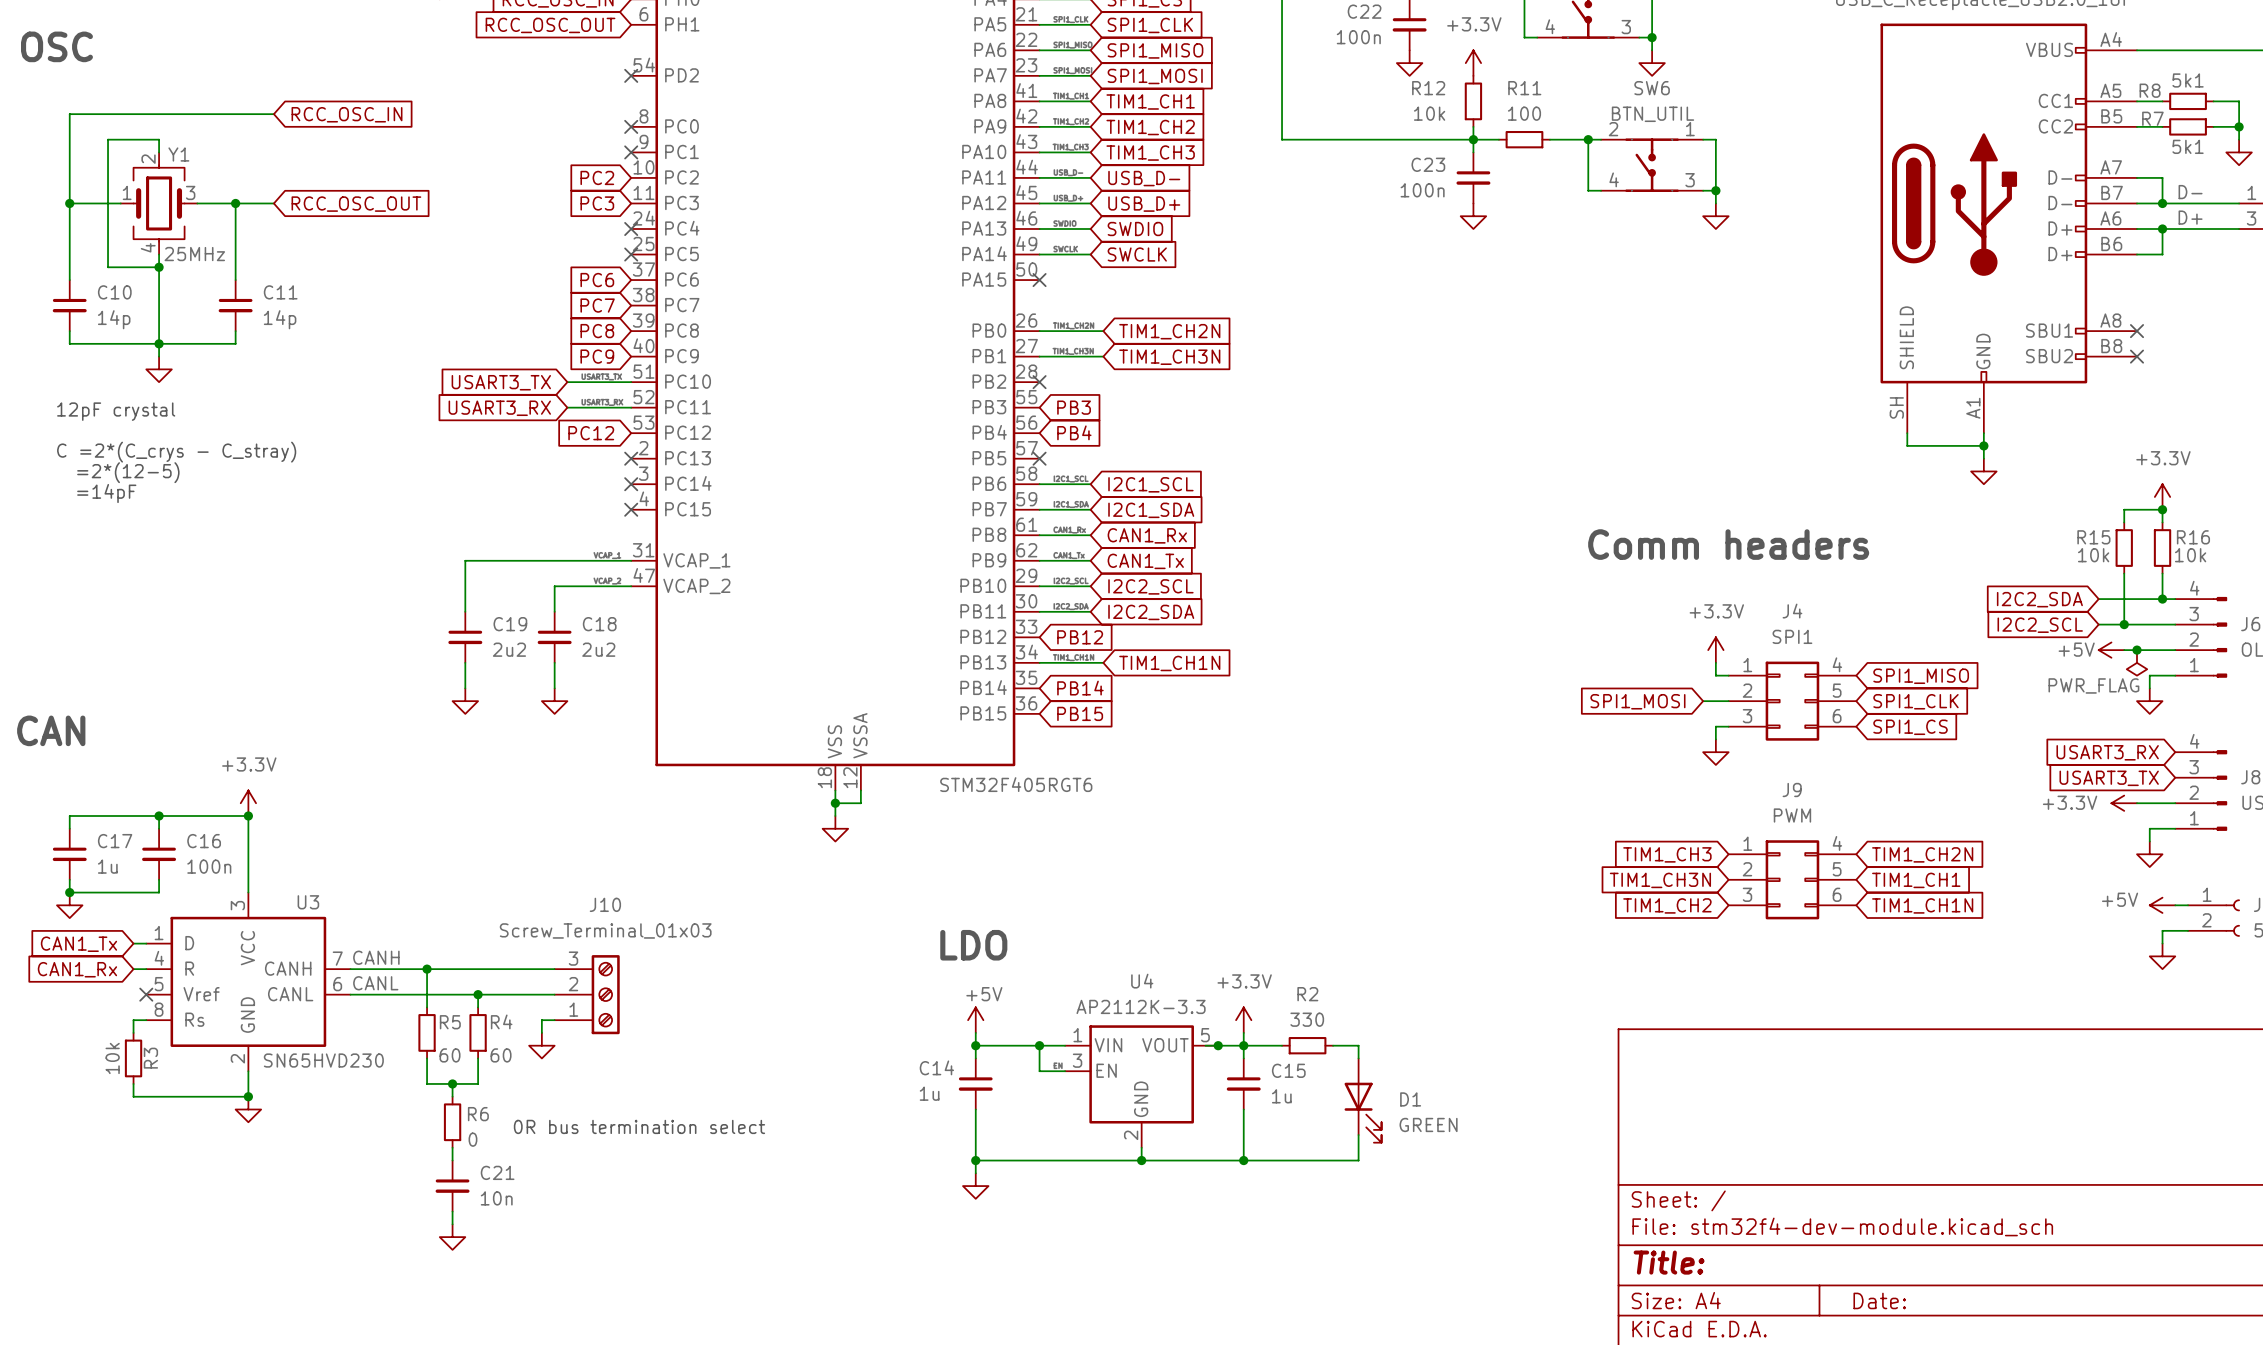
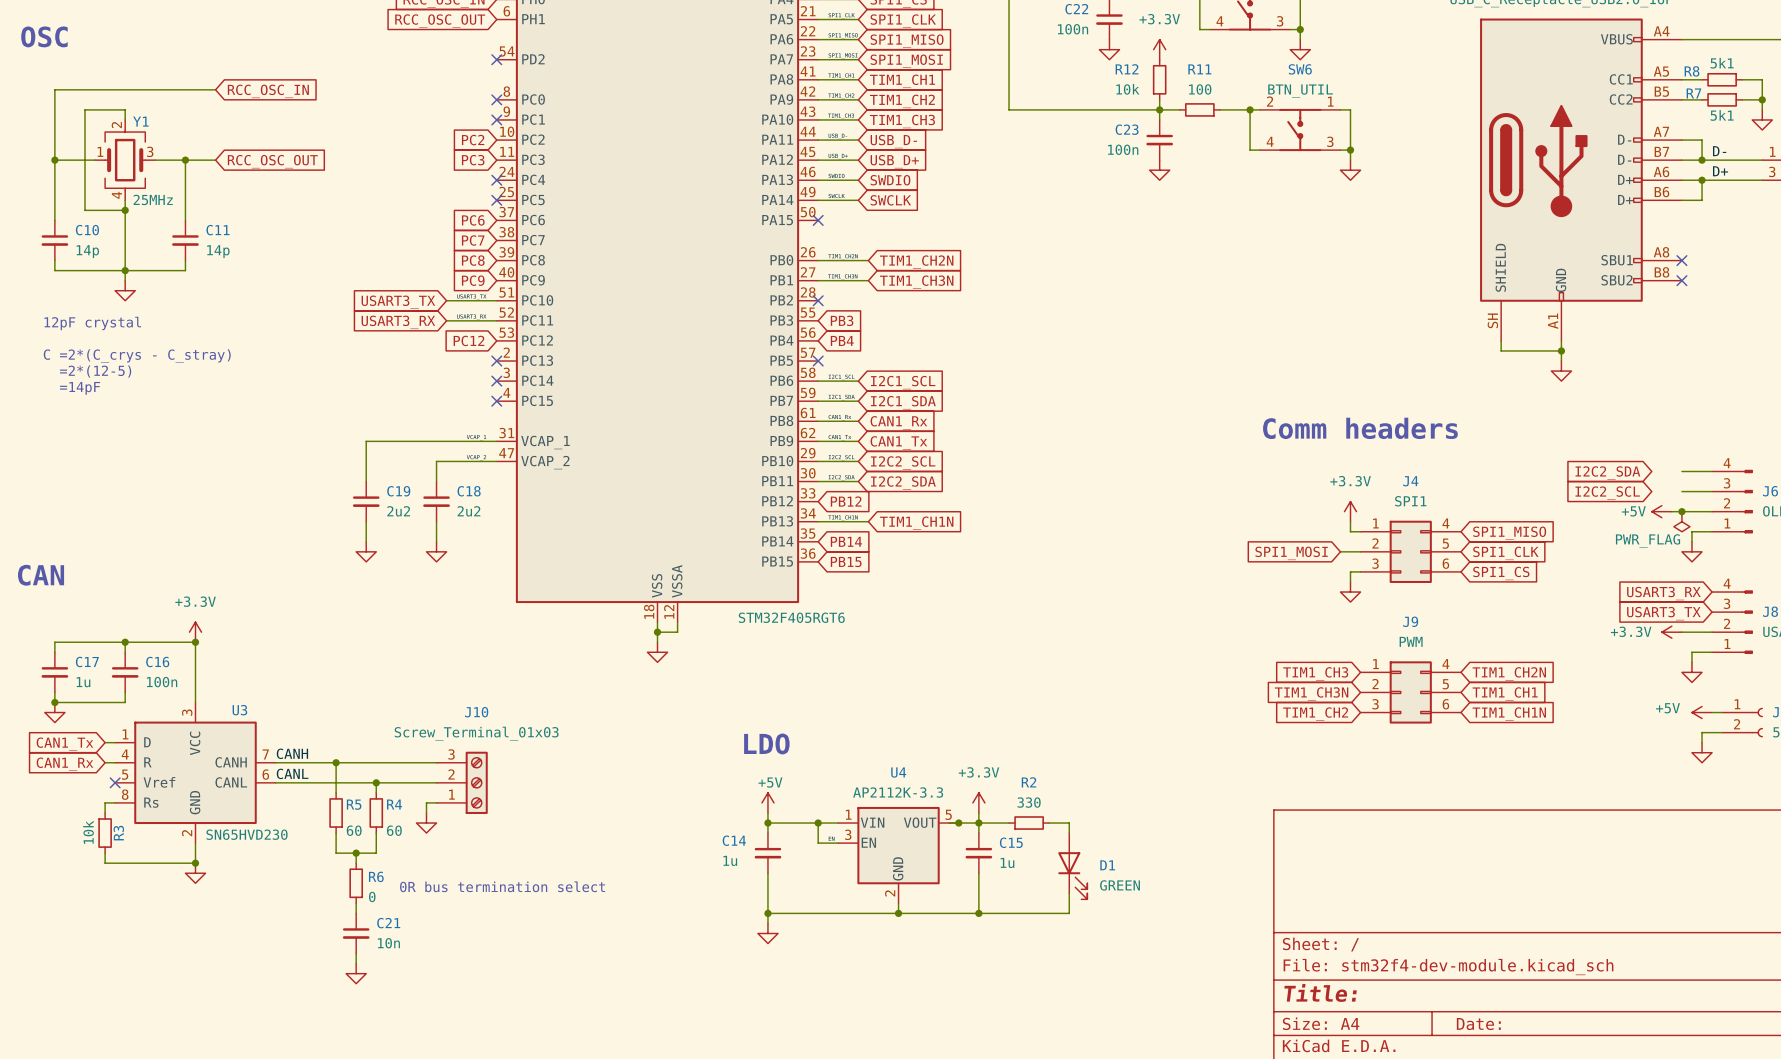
power symbol: +3.3V (2162, 496) -> none
junction: (2162, 509) -> none
wire: (2124, 522) (2124, 509) (2162, 509) (2162, 522) -> none
R15: 10k (2124, 548) -> none
R16: 10k (2162, 548) -> none
wire: (2124, 573) (2124, 624) -> none
wire: (2162, 573) (2162, 599) -> none
wire: (2098, 599) (2137, 599) -> none
junction: (2162, 599) -> none
wire: (2098, 624) (2137, 624) -> none
junction: (2124, 624) -> none

